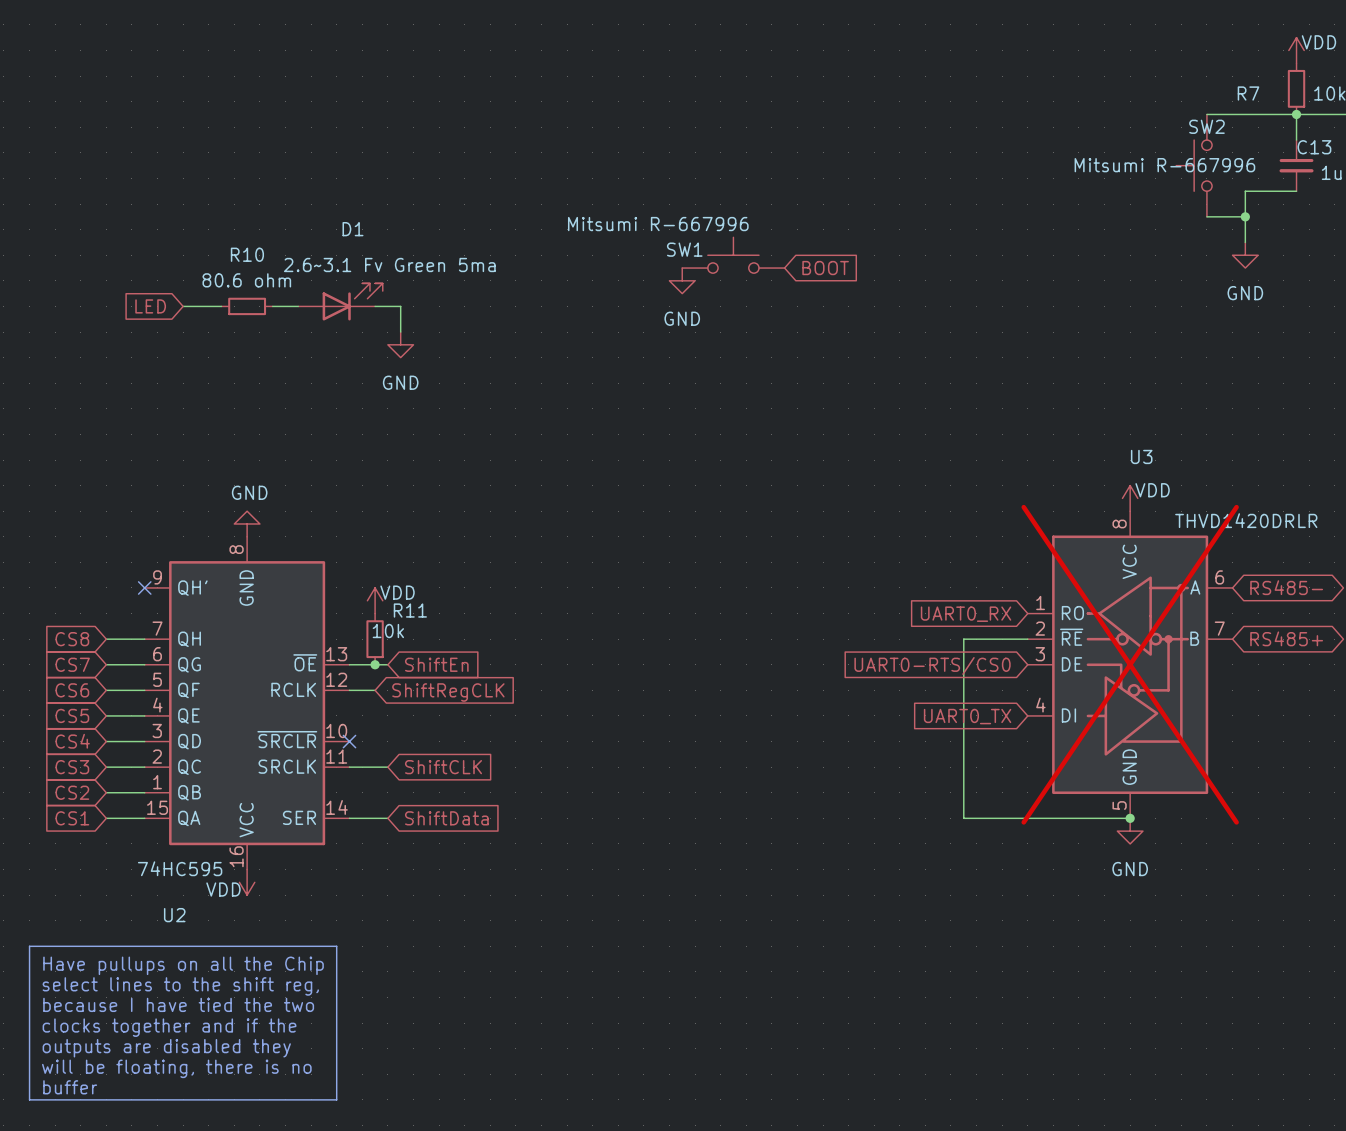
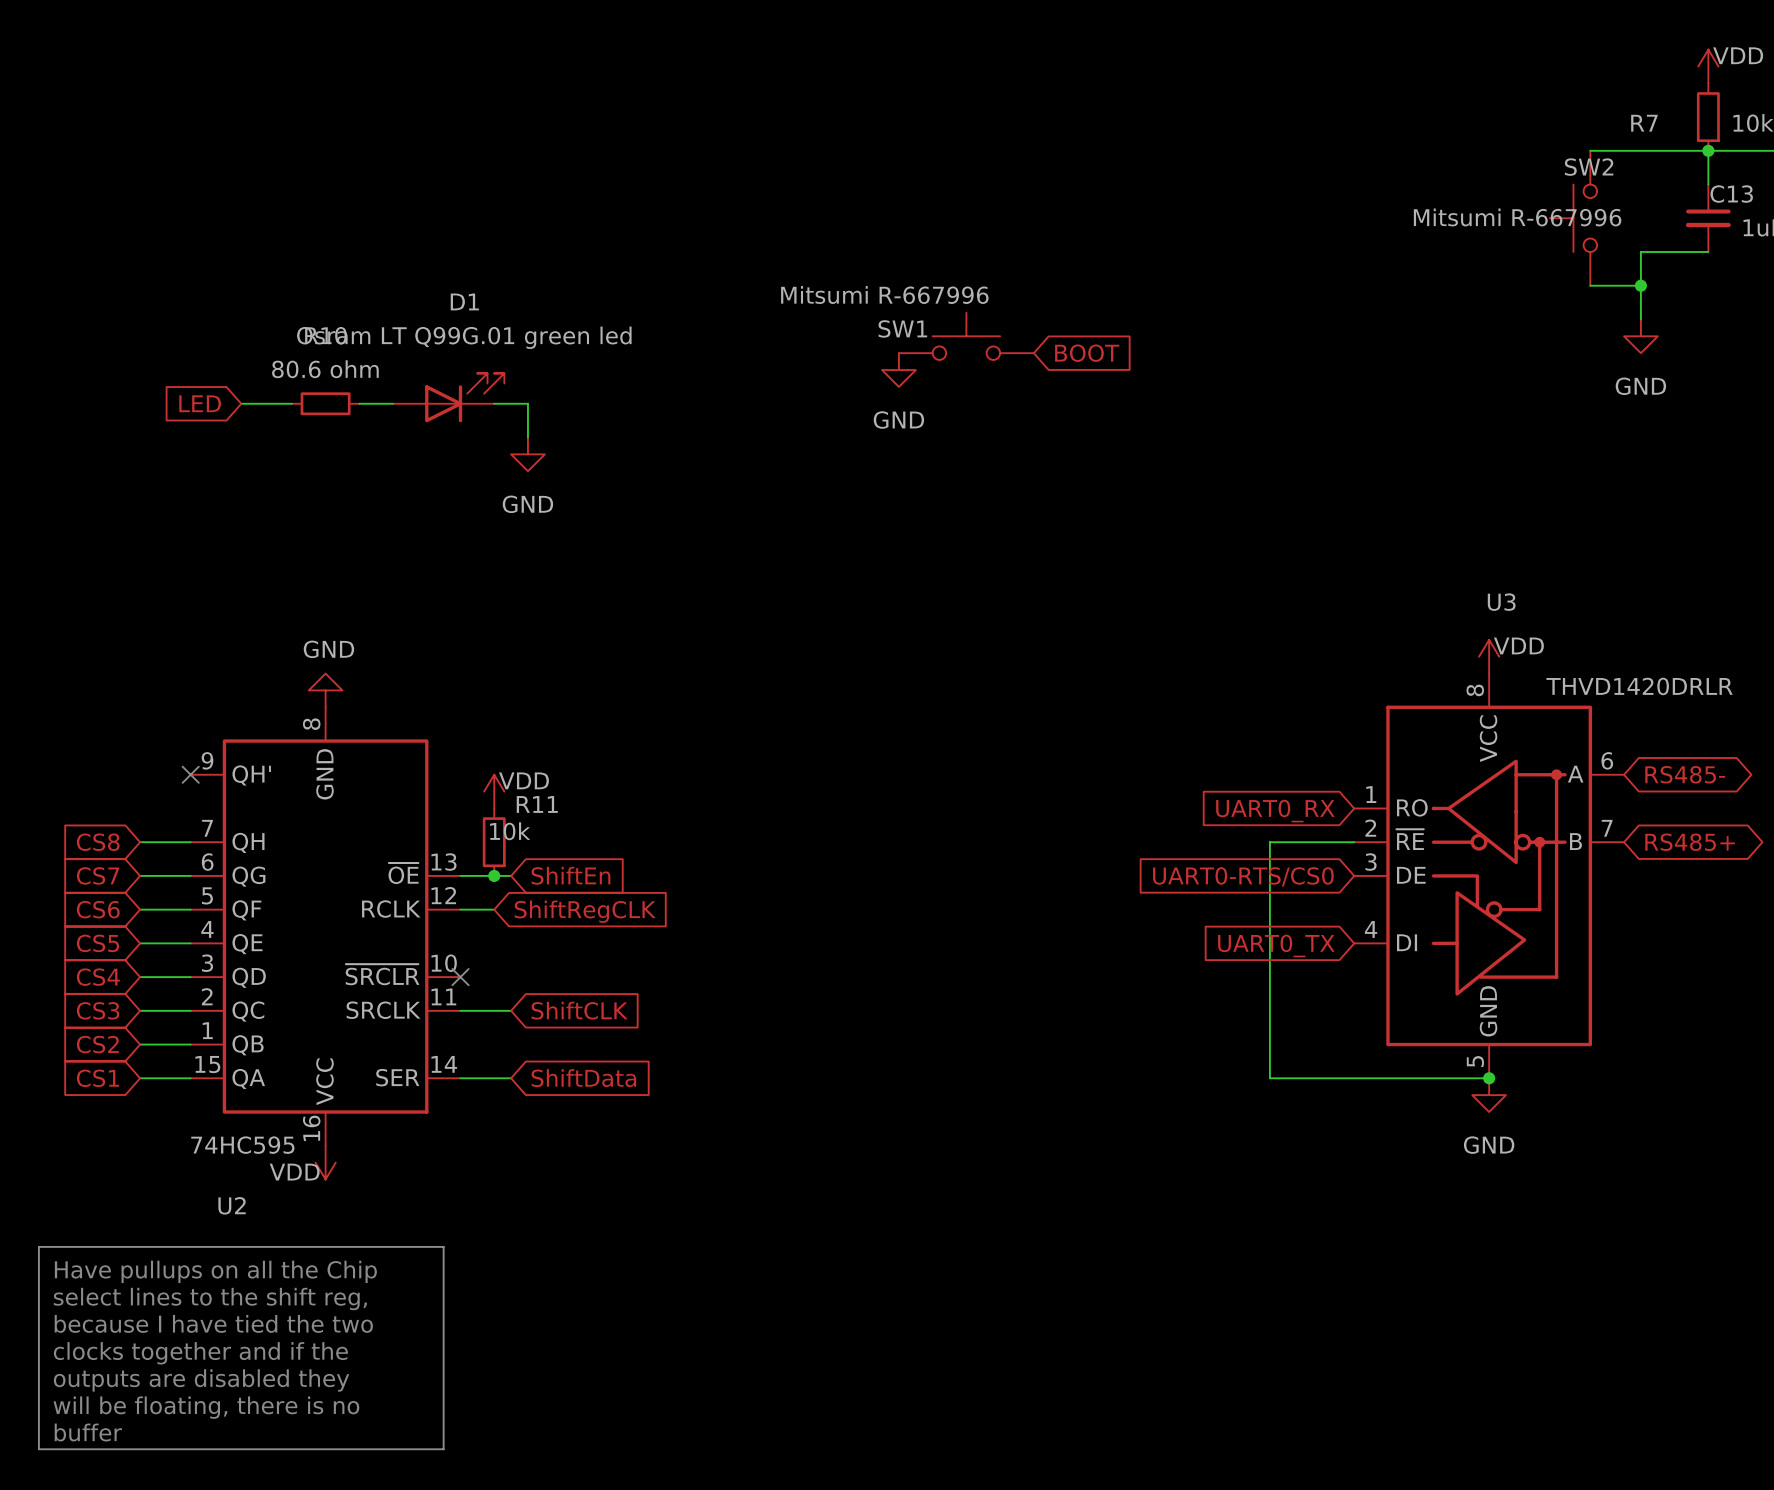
D1 value: 2.6~3.1 Fv Green 5ma (389, 265) -> Osram LT Q99G.01 green led (464, 337)
U3 do-not-place cross: (1130, 664) -> none

